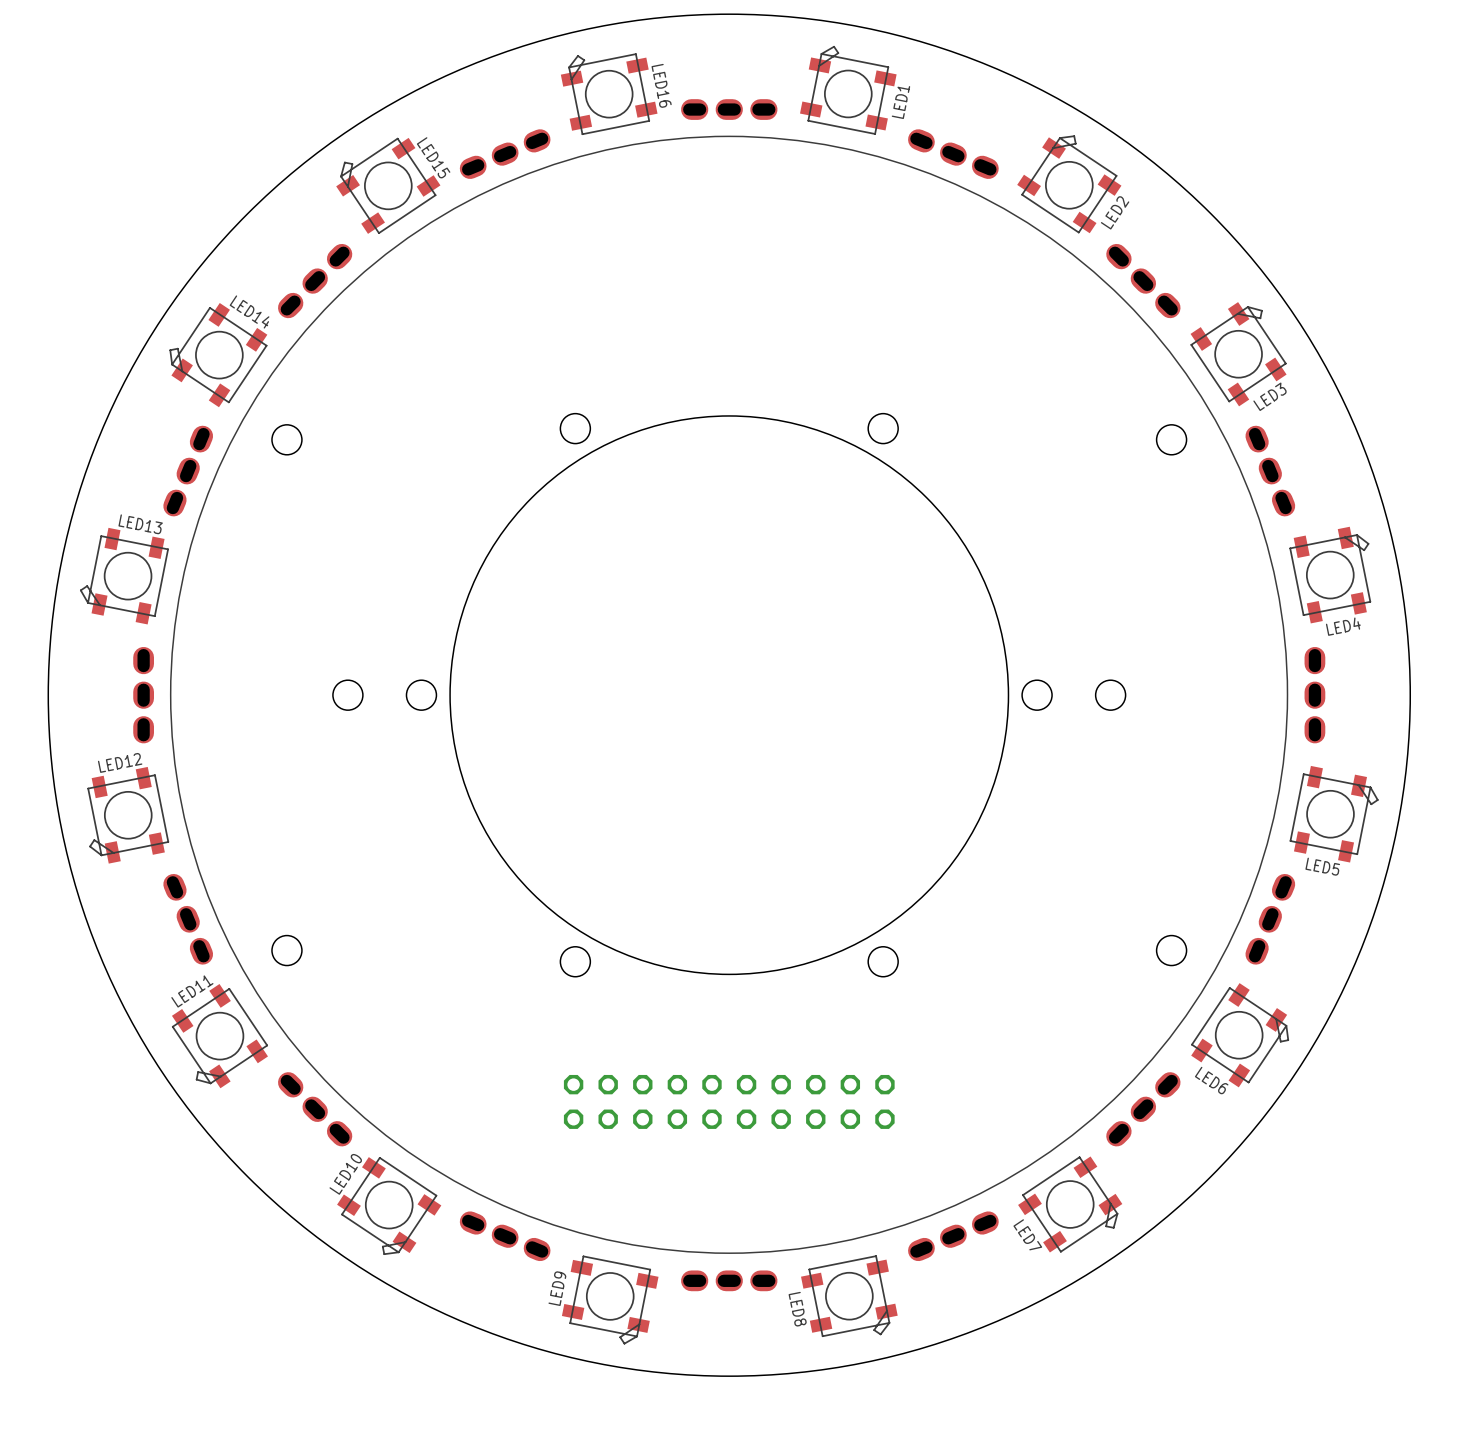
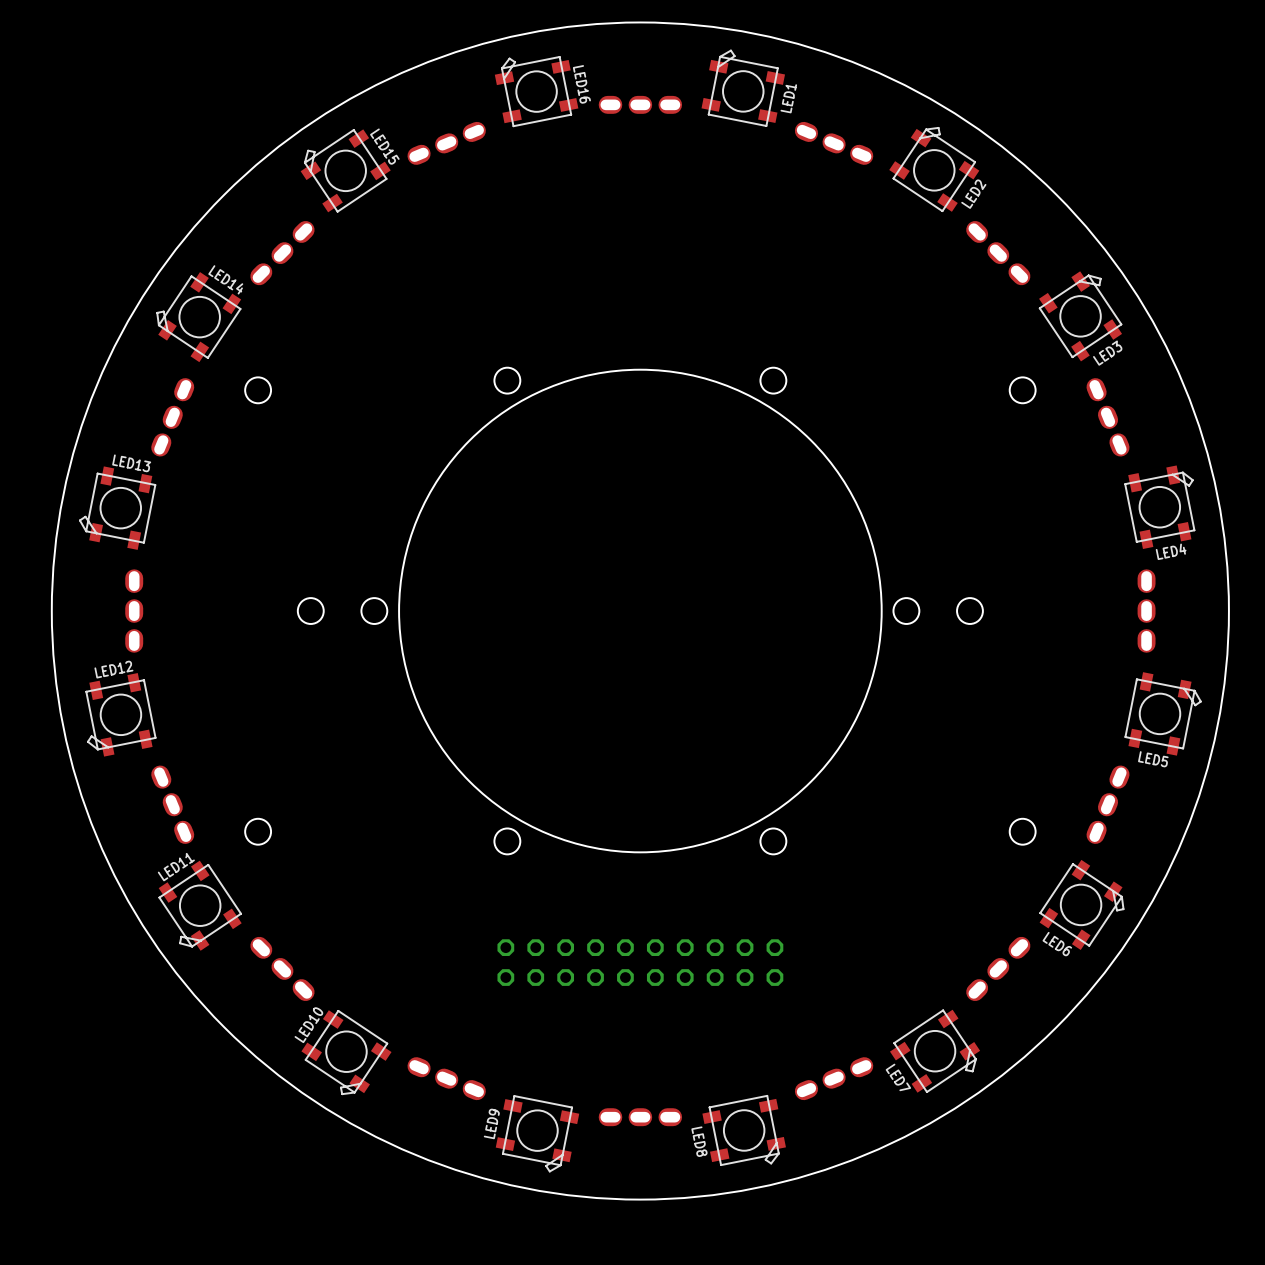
drawing: [170, 136, 1288, 1254] -> none

